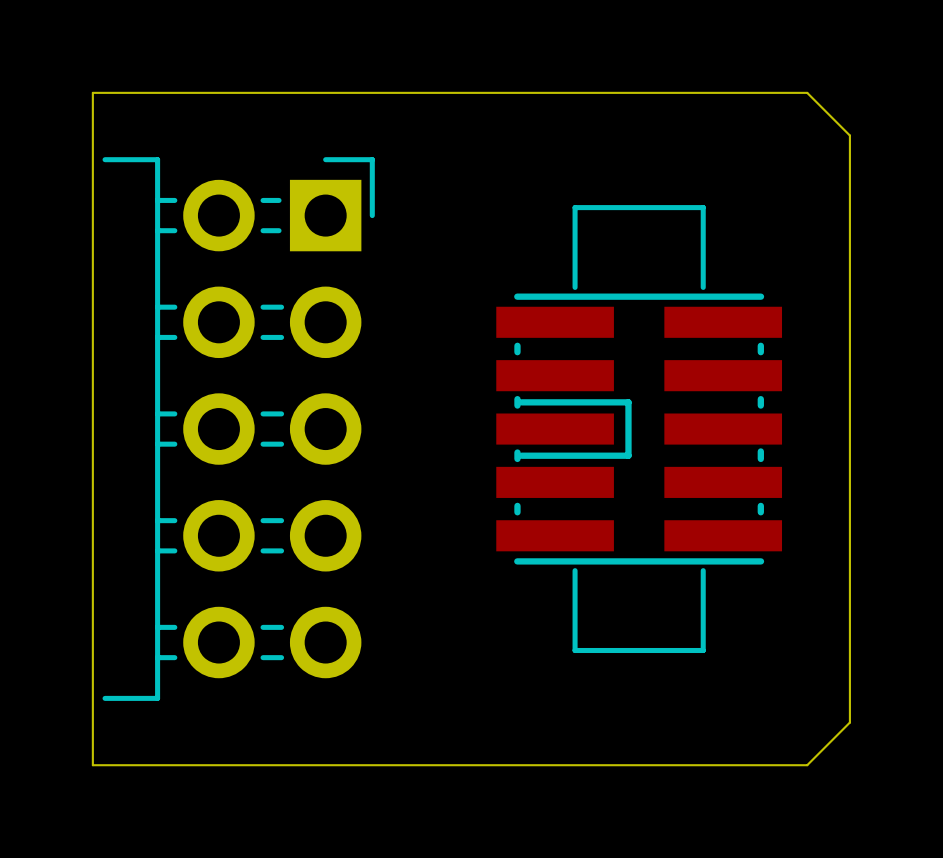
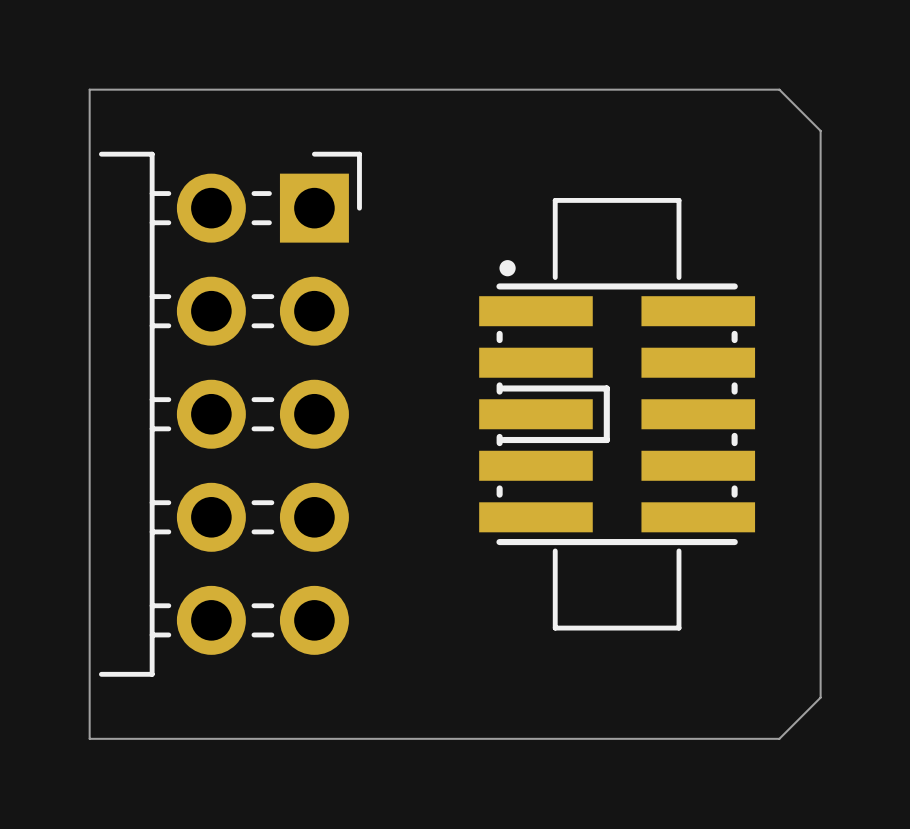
part footprint: [496, 205, 783, 654] -> [479, 198, 756, 631]

